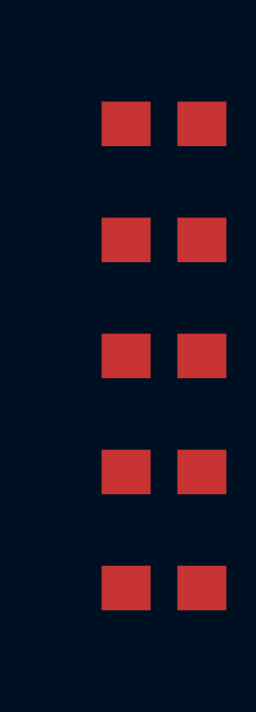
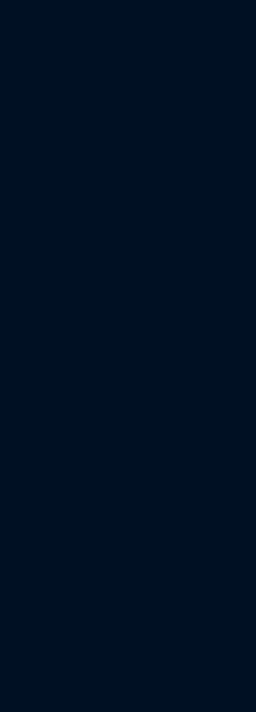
part: (163, 123) -> none
part: (163, 239) -> none
part: (163, 355) -> none
part: (163, 471) -> none
part: (163, 588) -> none

